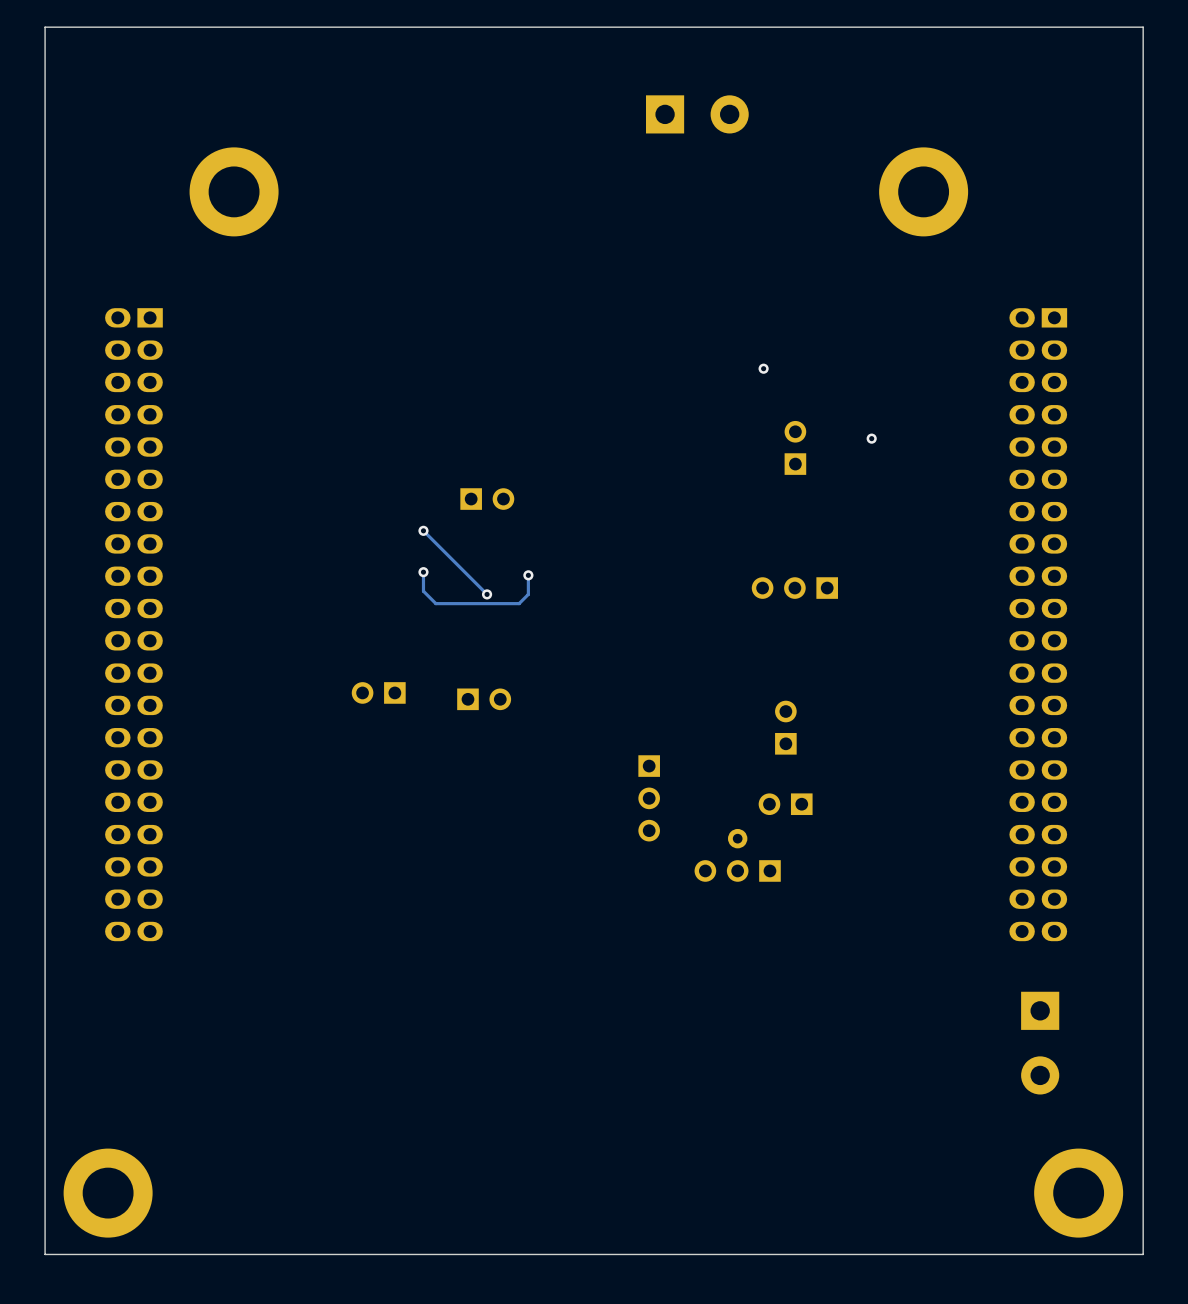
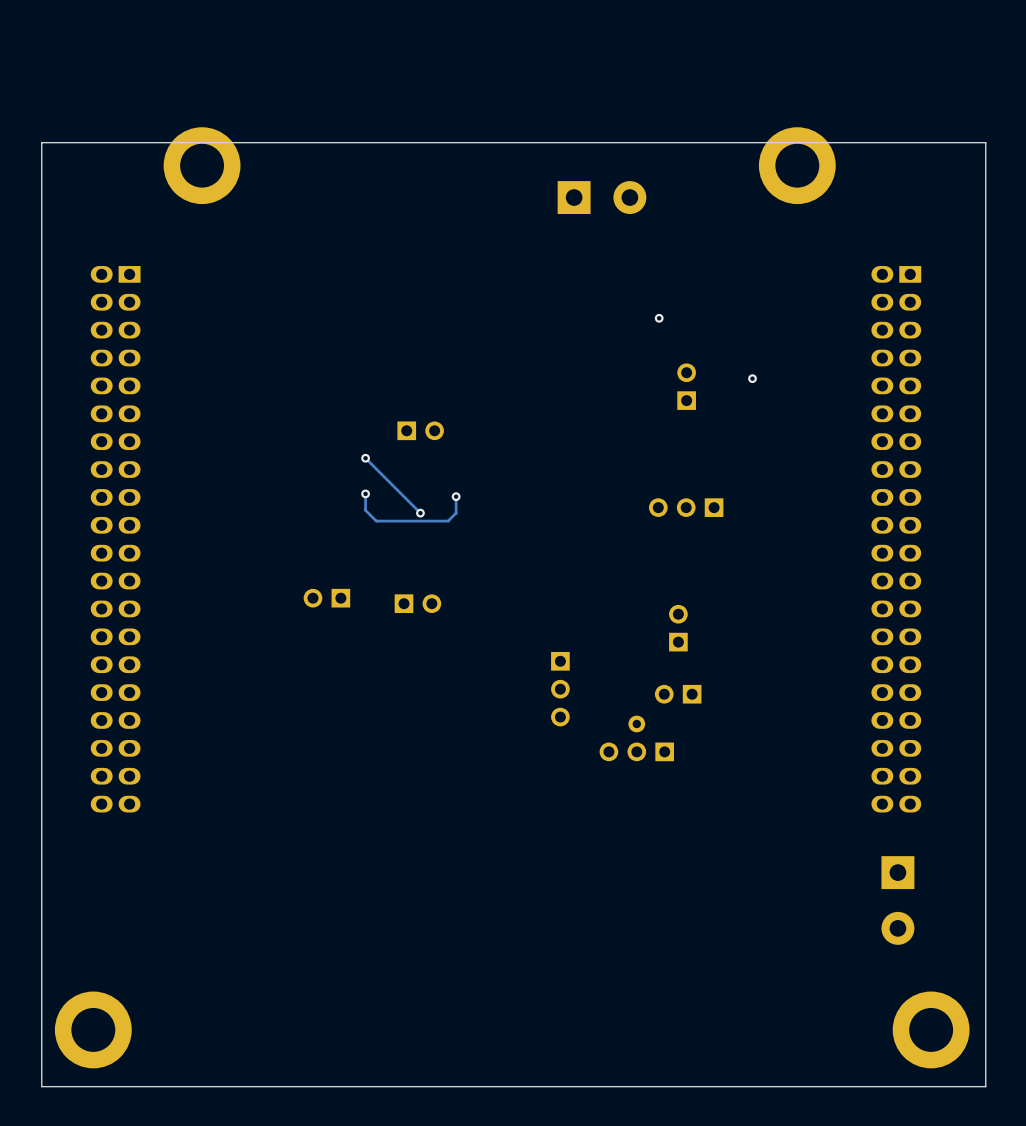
board edge: (1143, 27) (45, 27) (45, 1254) (1143, 1254) (1143, 27) -> (985, 142) (985, 1086) (41, 1086) (41, 142) (985, 142)
part position: (697, 114) -> (602, 197)

